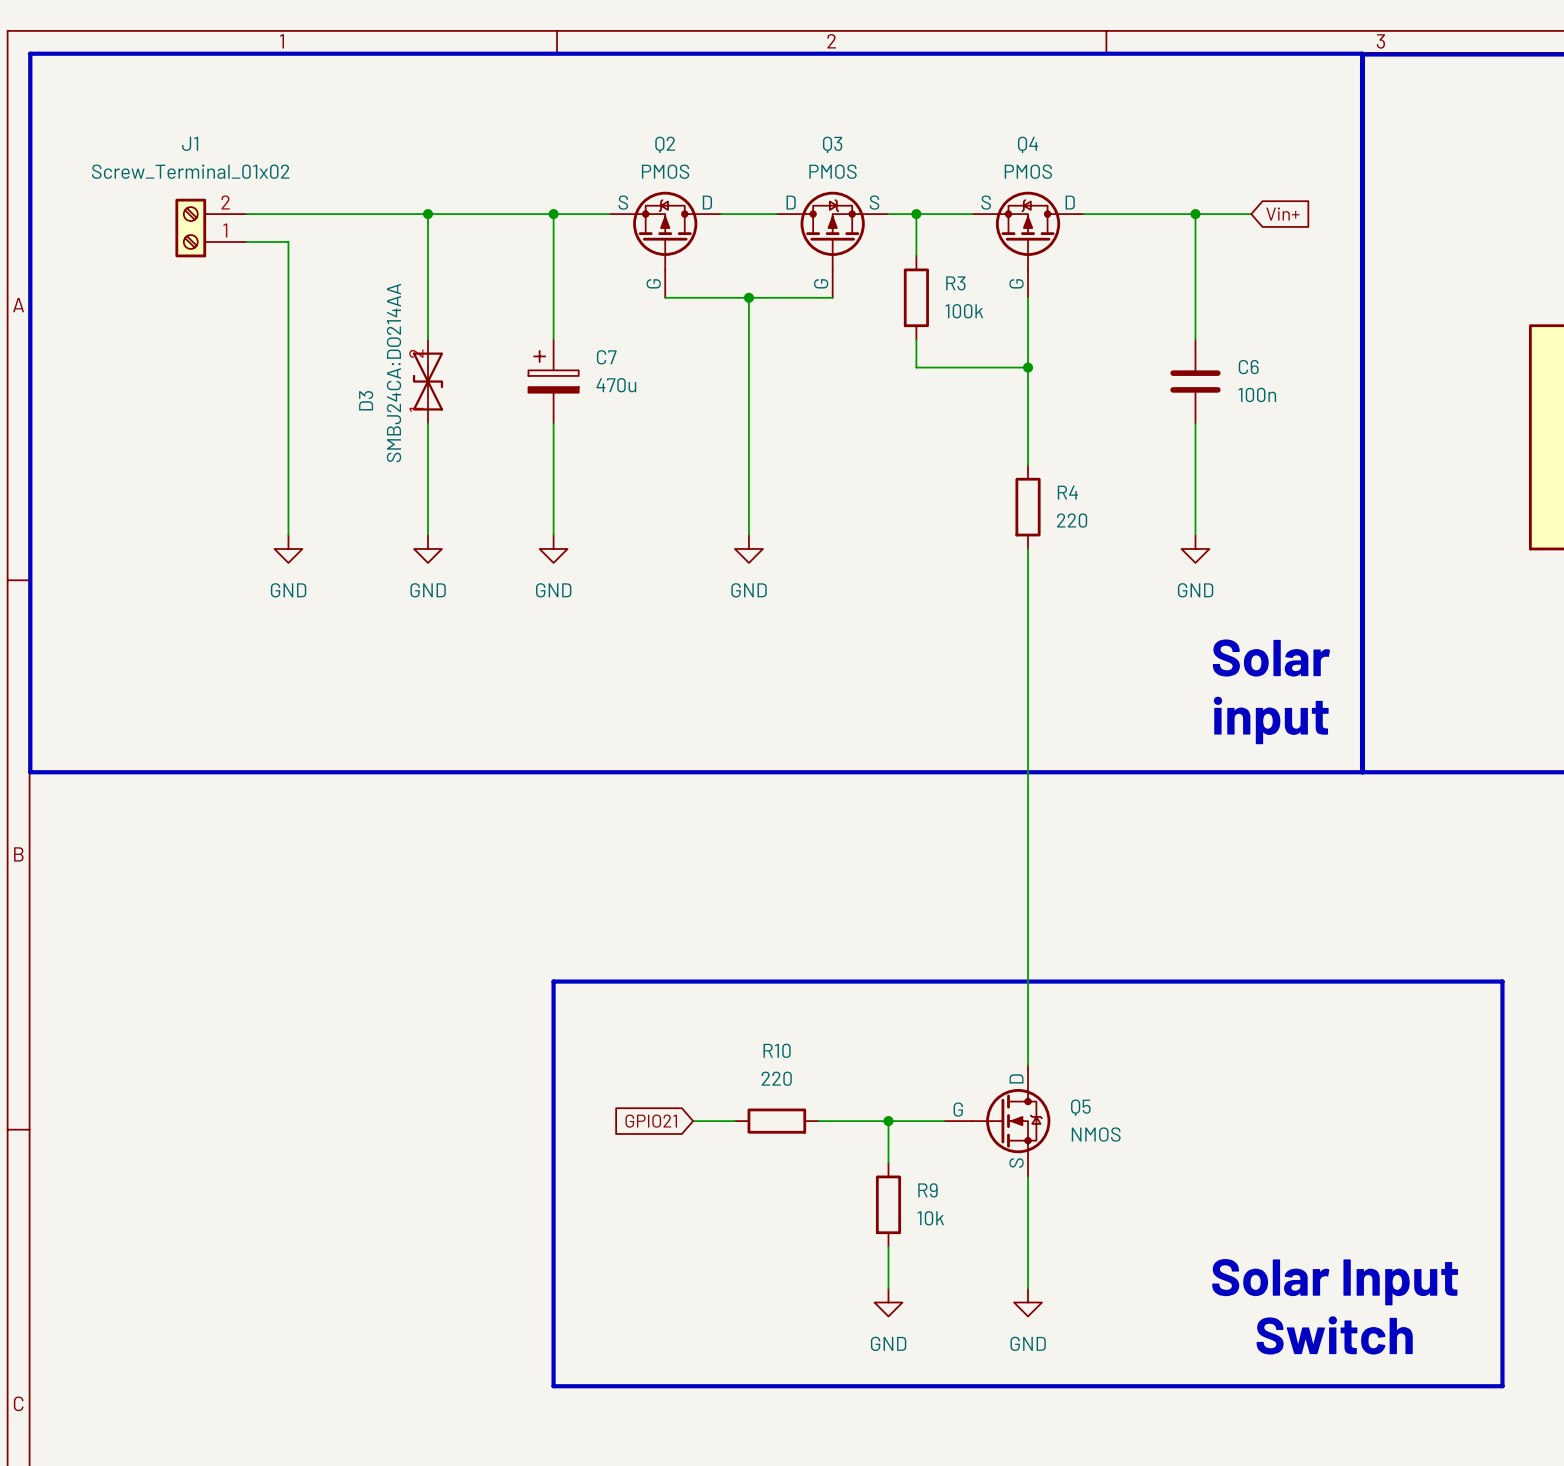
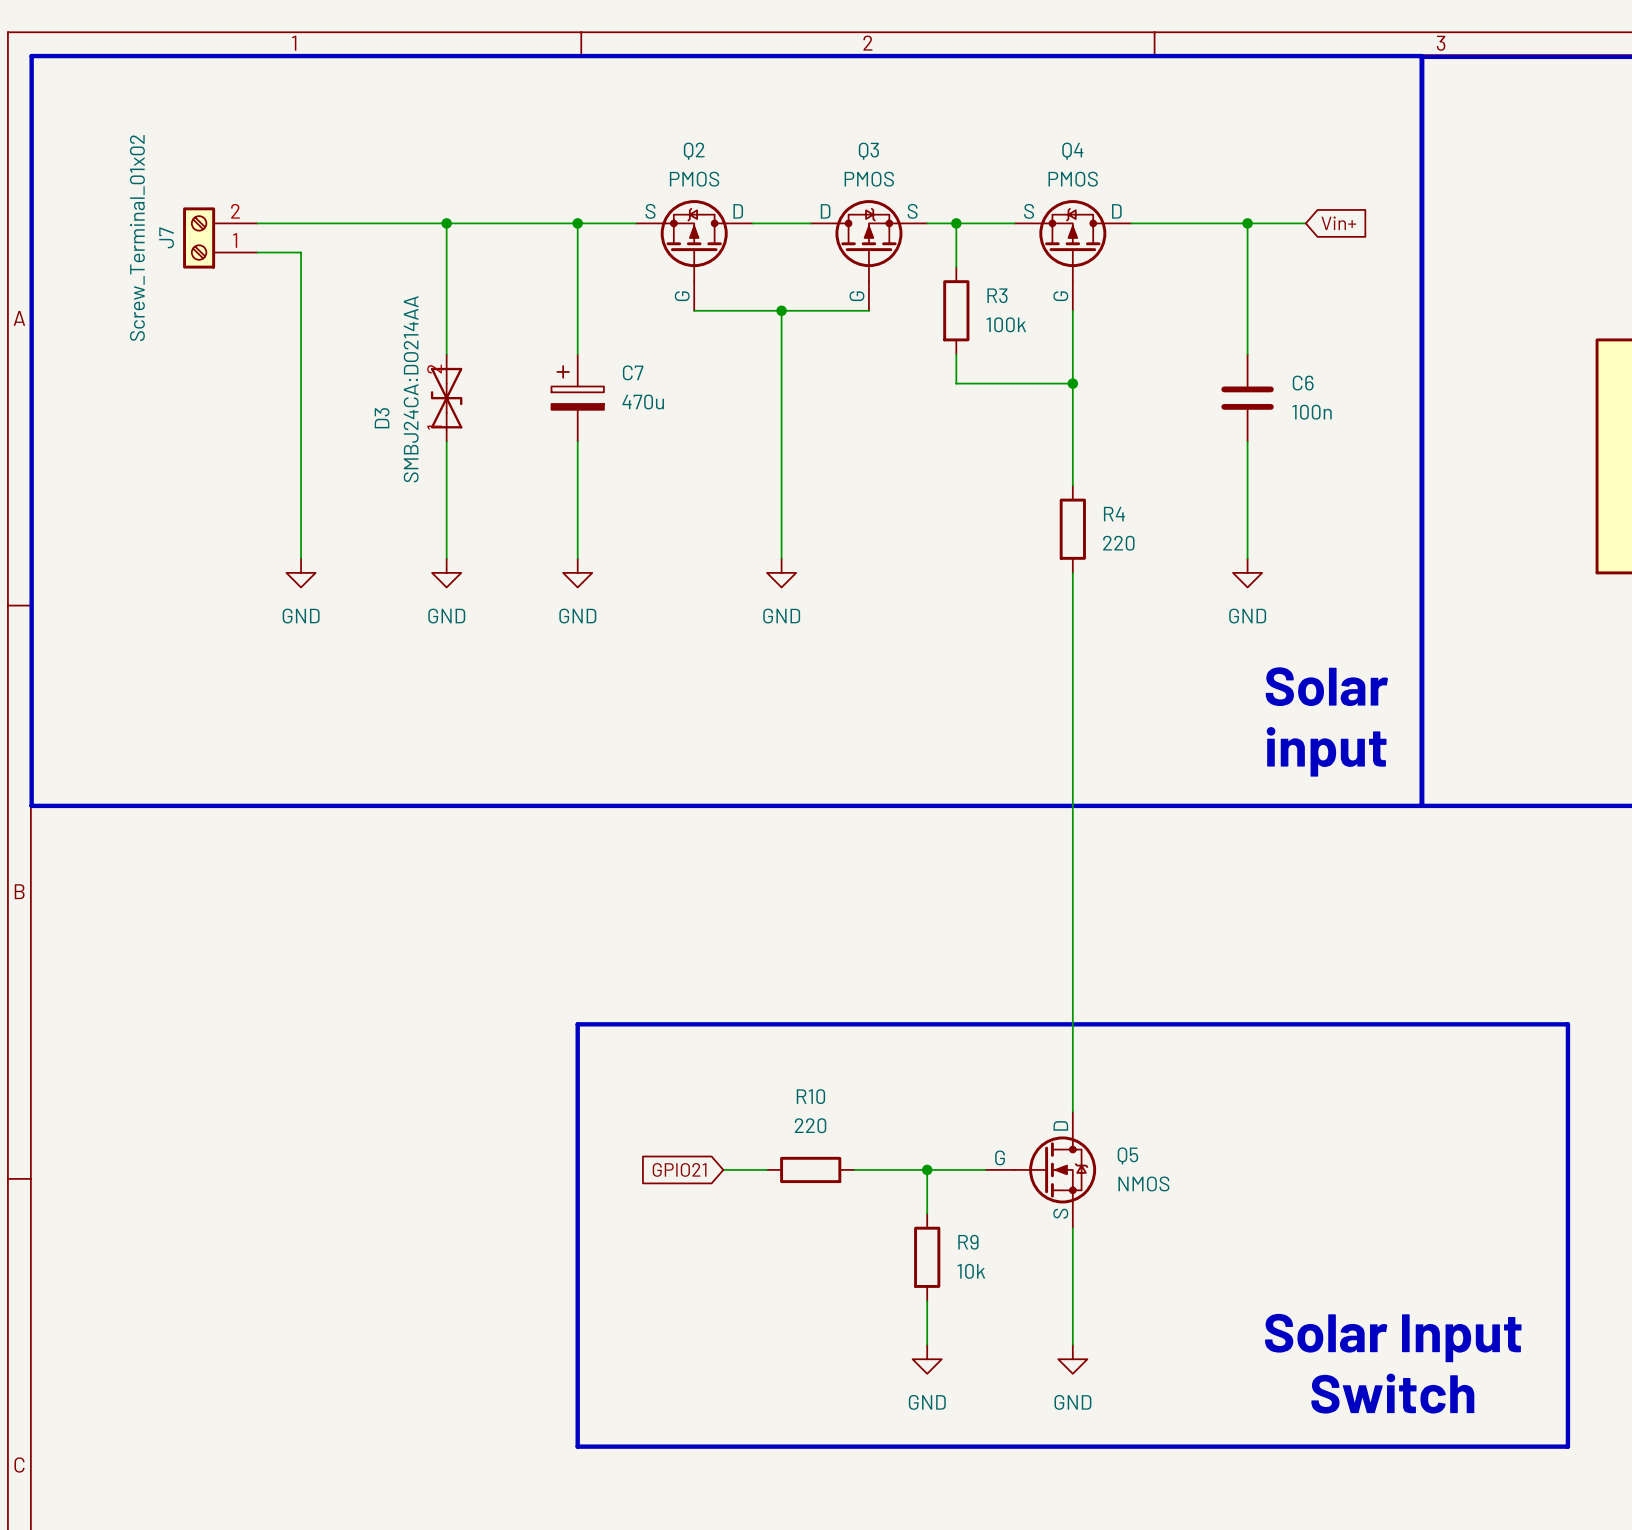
J1 name: J1 (190, 143) -> J7 (166, 237)
J1 value rotation: 0° (190, 171) -> 90° counterclockwise (137, 238)

